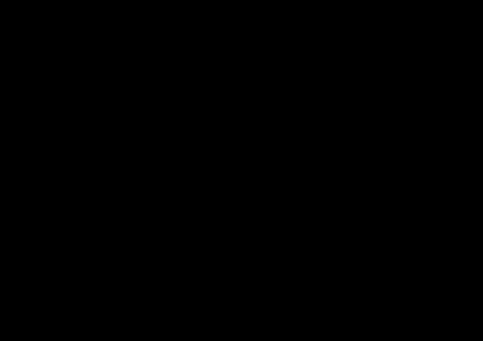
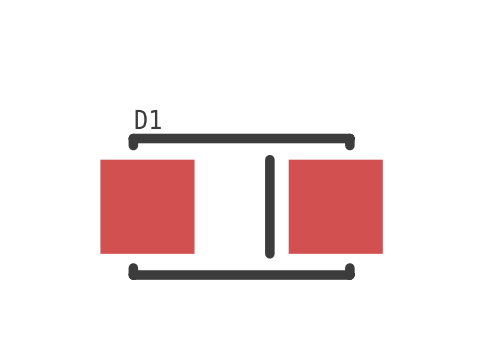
D1: none -> (241, 206)

